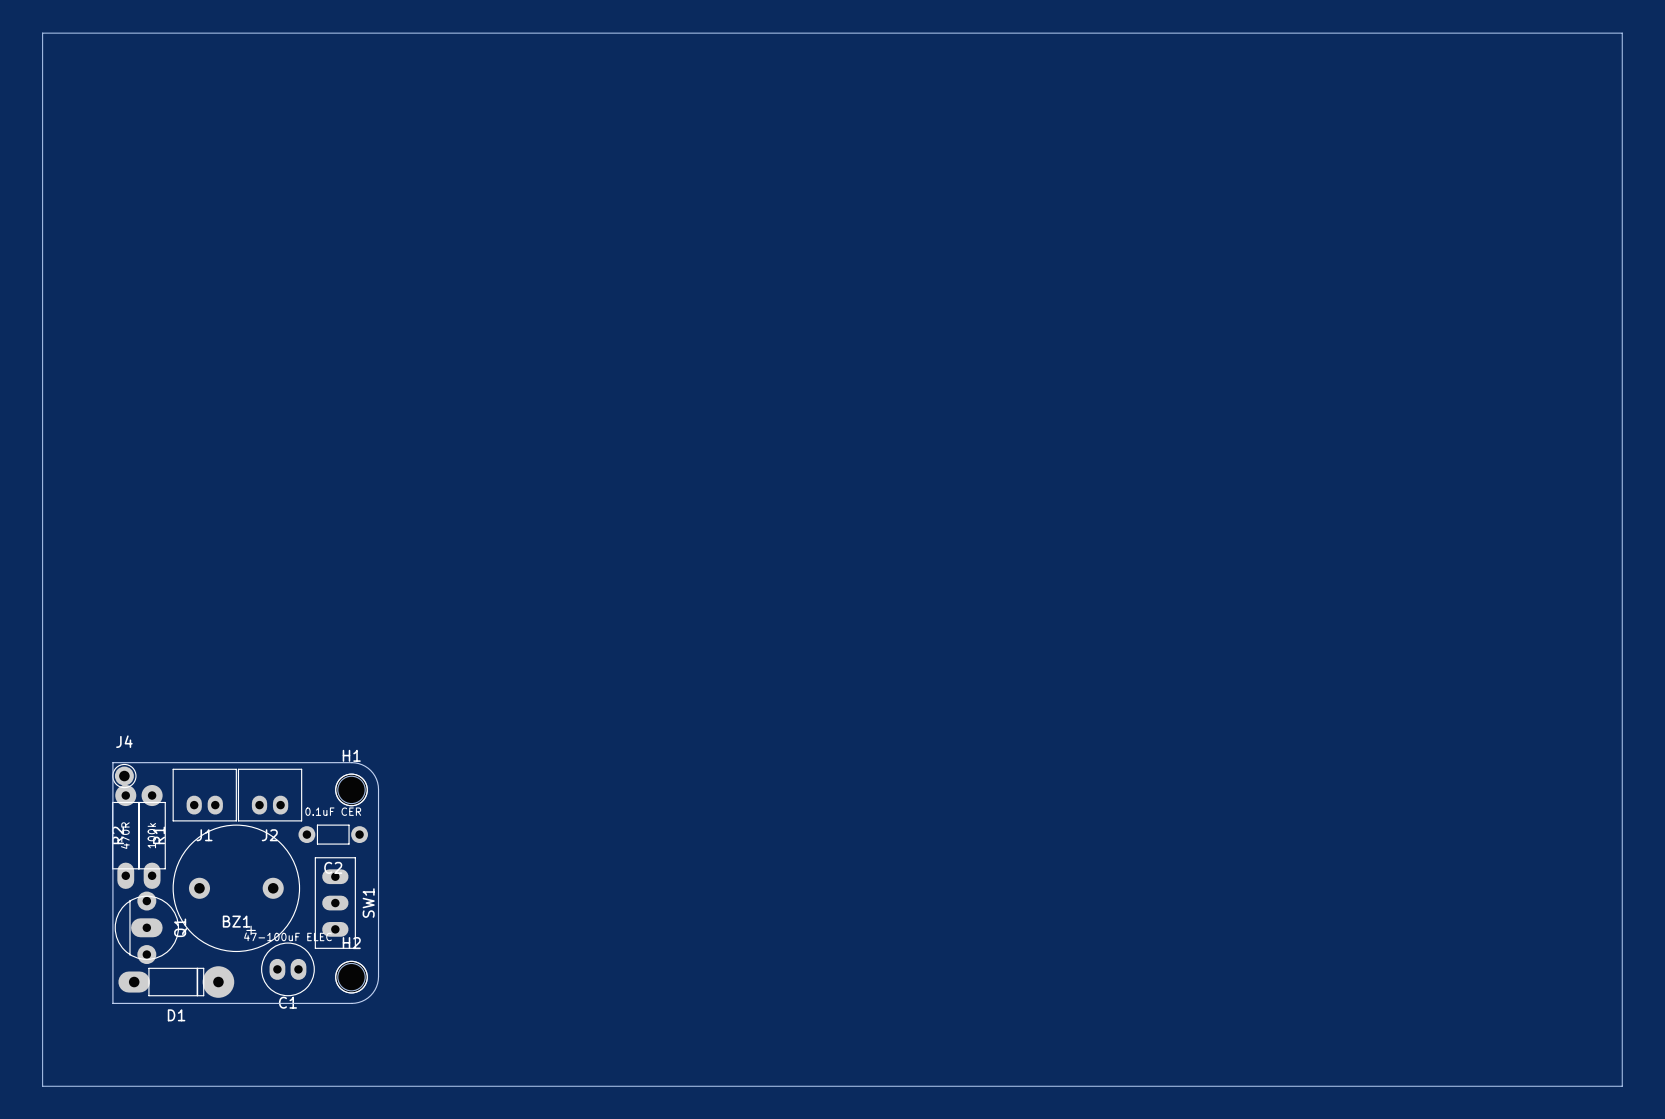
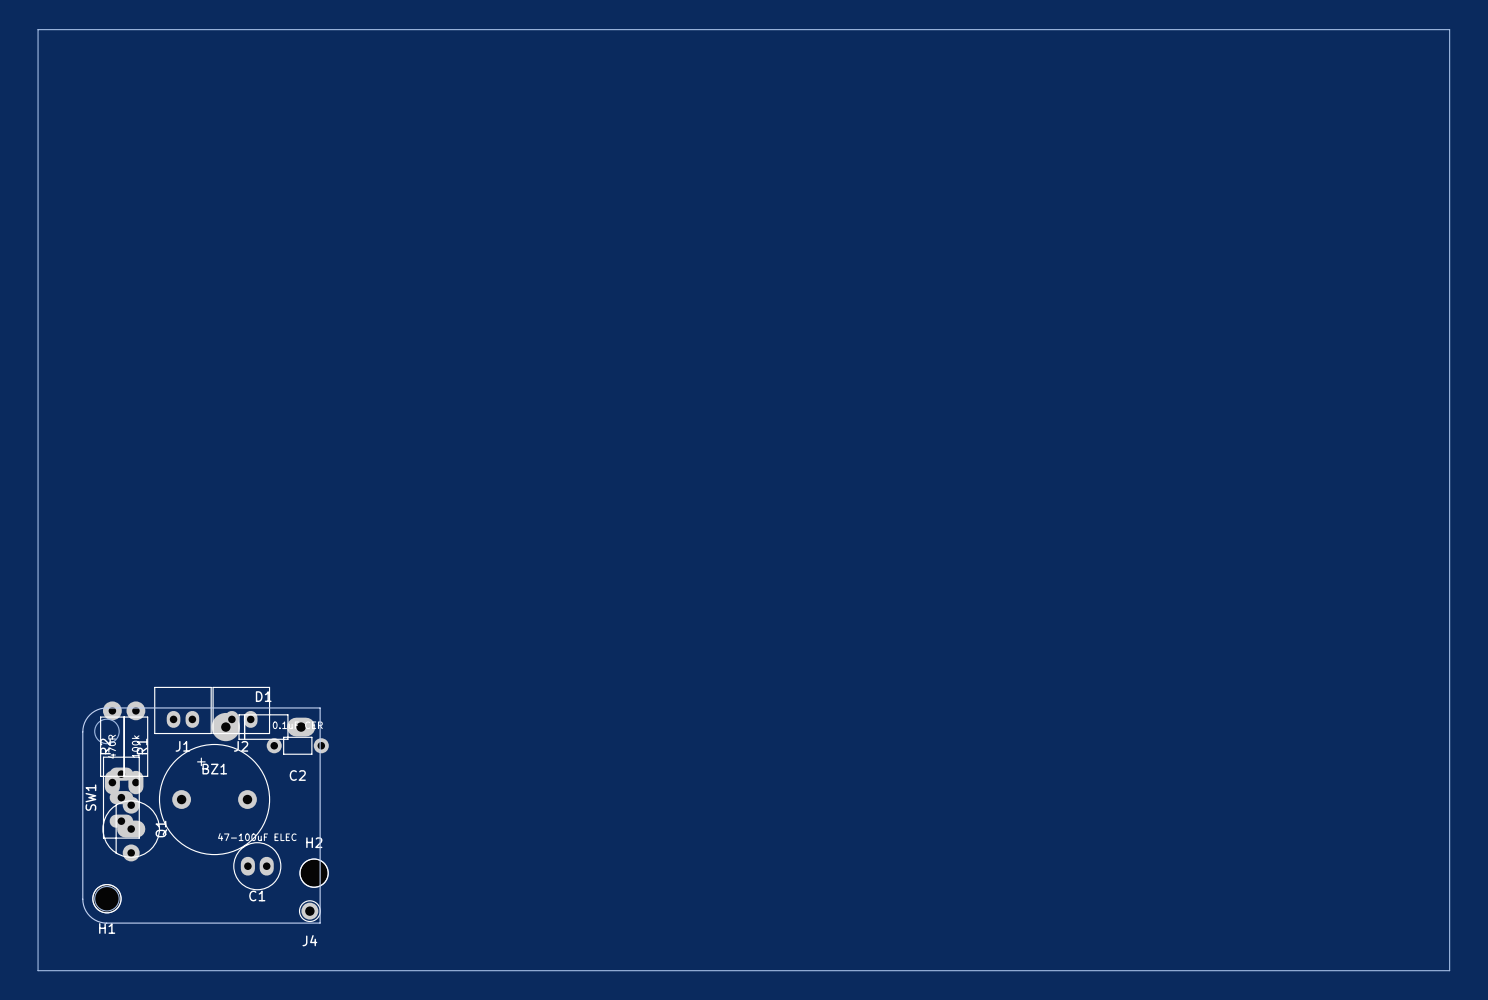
J4 name position: J4 (124, 741) -> J4 (309, 940)
H1 name position: H1 (351, 755) -> H1 (107, 928)
board edge: (112, 762) (112, 1003) (351, 1003) (362, 1001) (370, 995) (376, 986) (378, 976) (378, 789) (376, 779) (370, 770) (362, 764) (351, 762) (112, 762) -> (106, 707) (92, 712) (86, 719) (83, 728) (82, 899) (84, 908) (89, 916) (97, 921) (106, 923) (320, 923) (320, 707) (106, 707)
drawing: [337, 775, 366, 805] -> none
J4 position: (124, 776) -> (309, 911)
H1 position: (351, 789) -> (106, 898)
drawing: none -> [94, 718, 120, 745]
BZ1 footprint: [172, 824, 301, 953] -> [159, 744, 271, 856]
SW1 position: (335, 903) -> (121, 797)
SW1 name position: SW1 (368, 903) -> SW1 (90, 797)
BZ1 name position: BZ1 (236, 921) -> BZ1 (214, 769)
drawing: [337, 962, 366, 992] -> none
D1 rotation: 0° (176, 982) -> 180° (263, 727)
D1 position: (176, 982) -> (263, 727)
drawing: none -> [94, 886, 120, 912]

